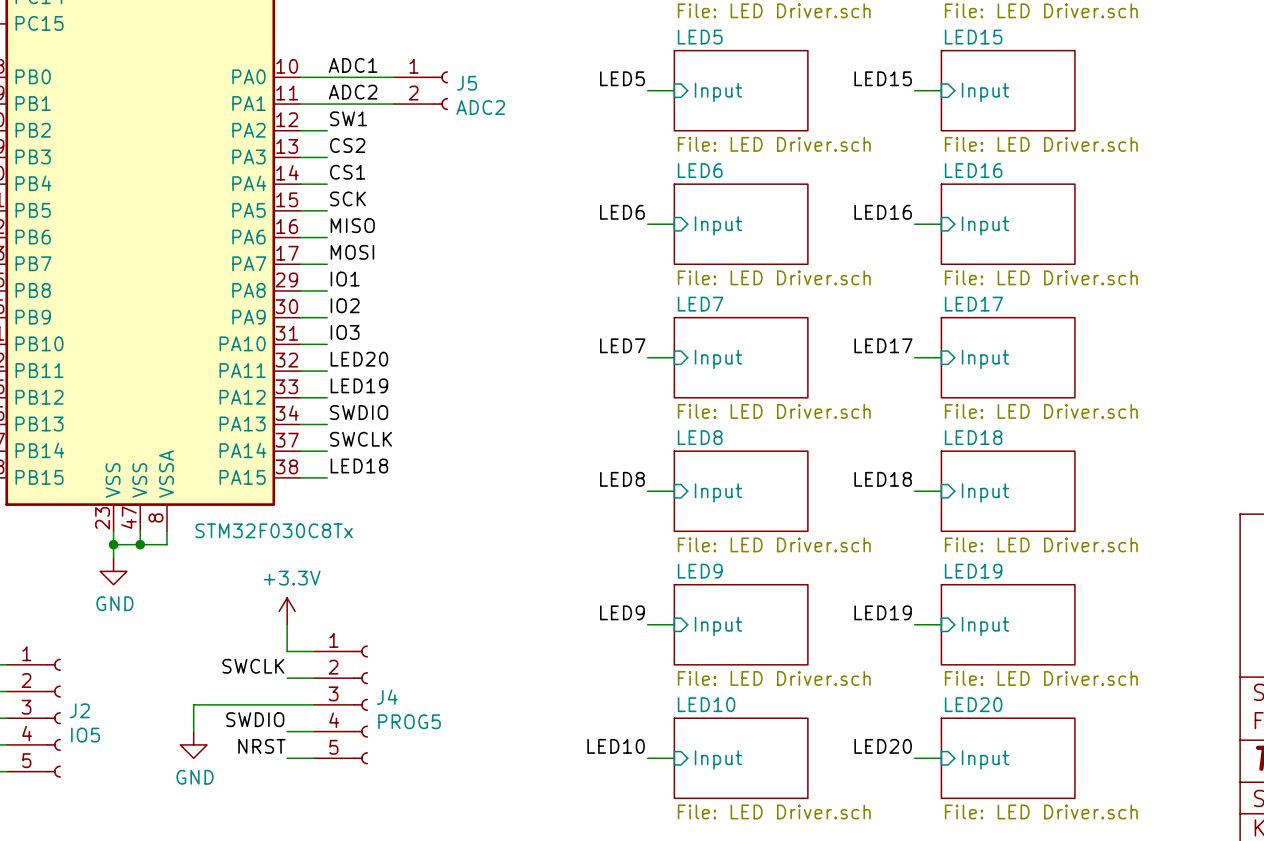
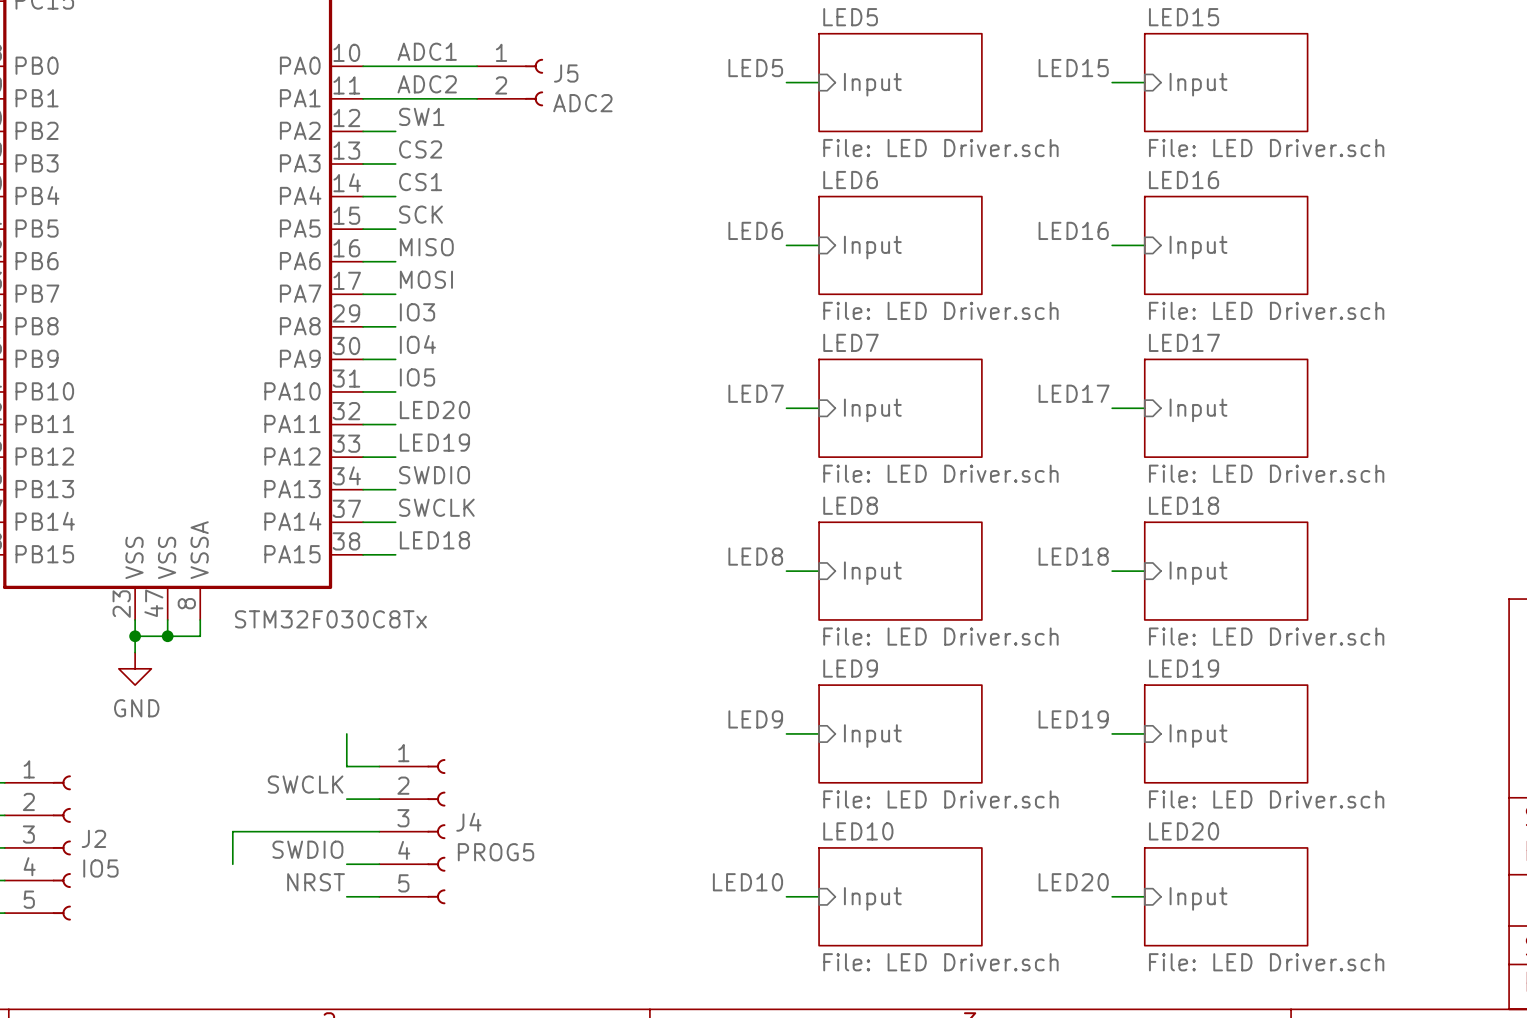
label: IO1 (345, 279) -> IO3 (417, 312)
label: IO2 (345, 305) -> IO4 (417, 344)
label: IO3 (345, 332) -> IO5 (417, 377)
power symbol: +3.3V (287, 611) -> none
power symbol: GND (193, 744) -> none

